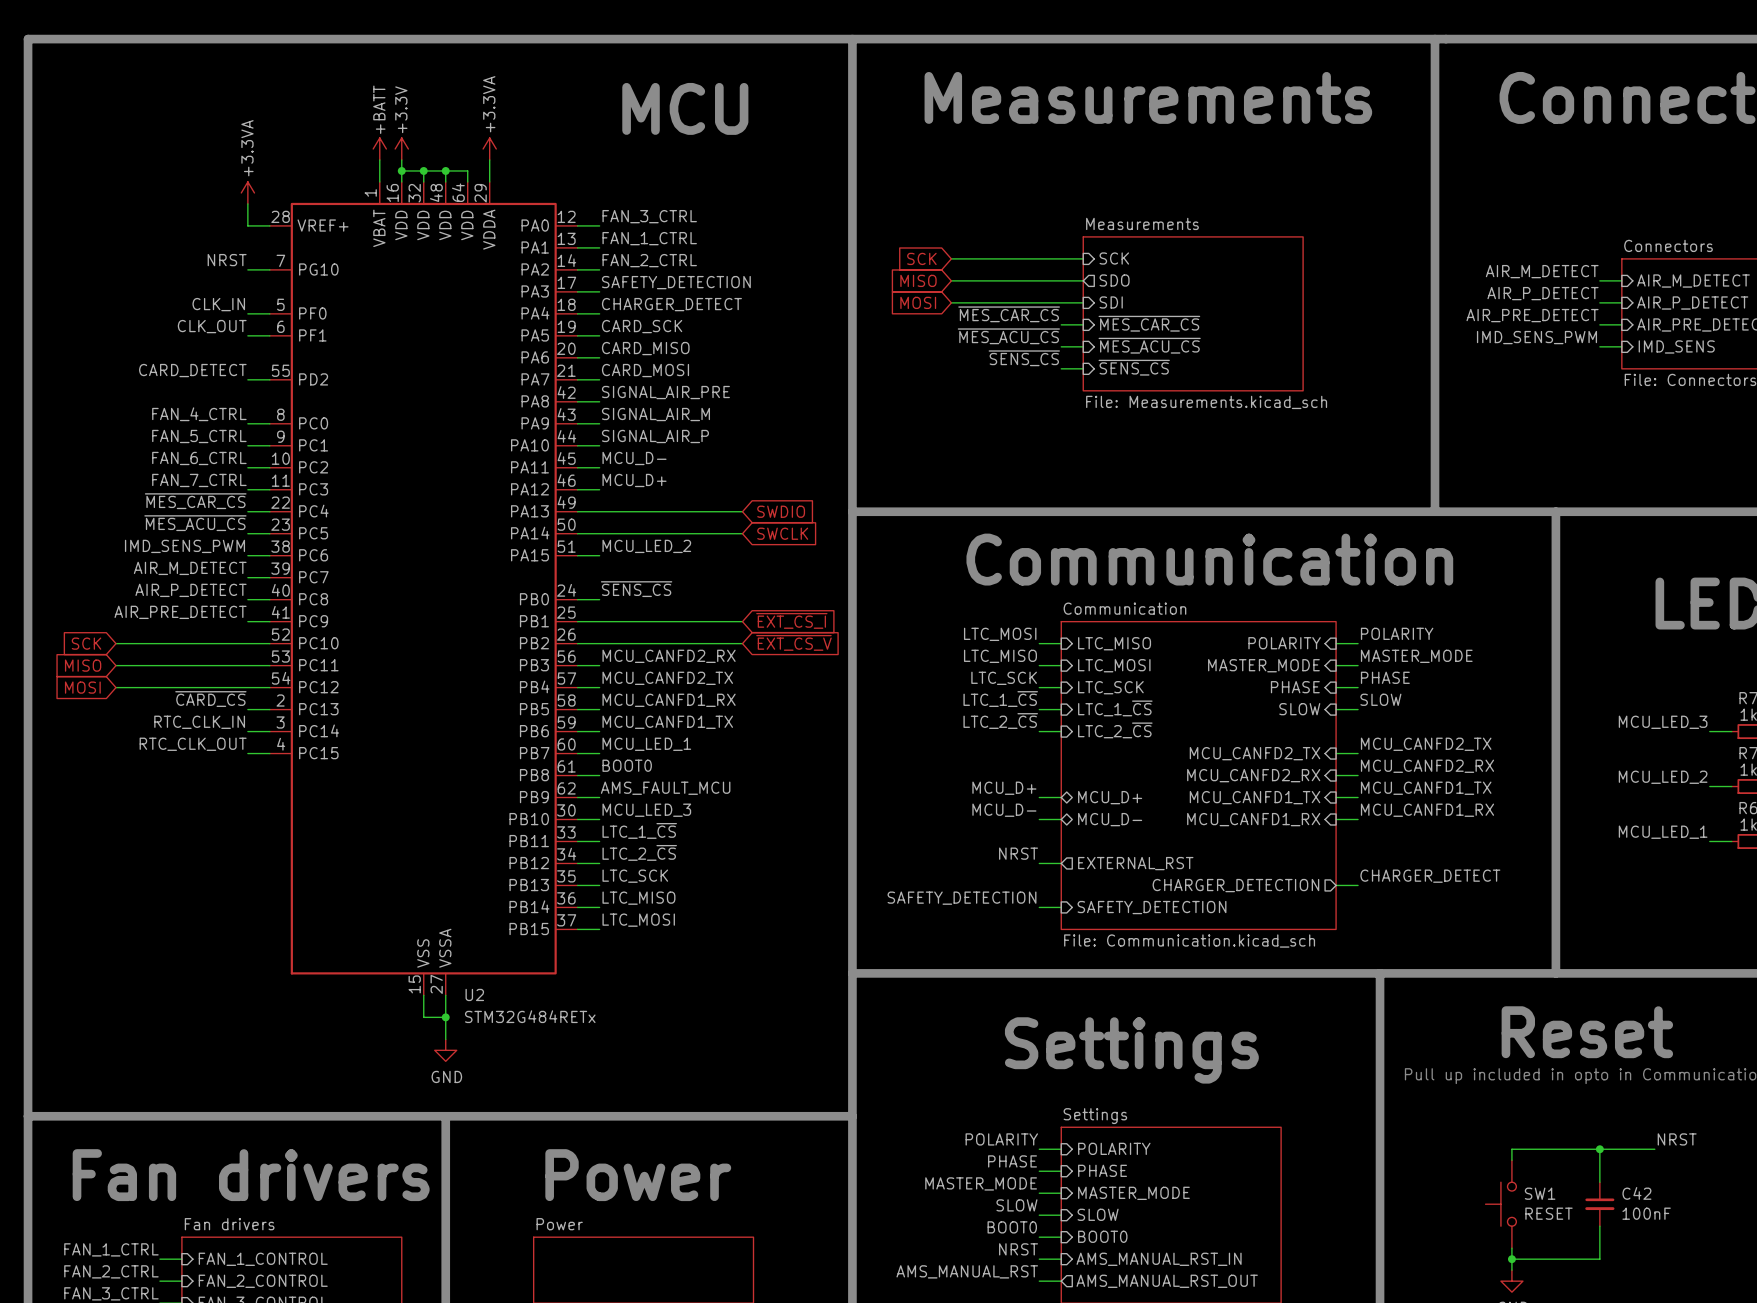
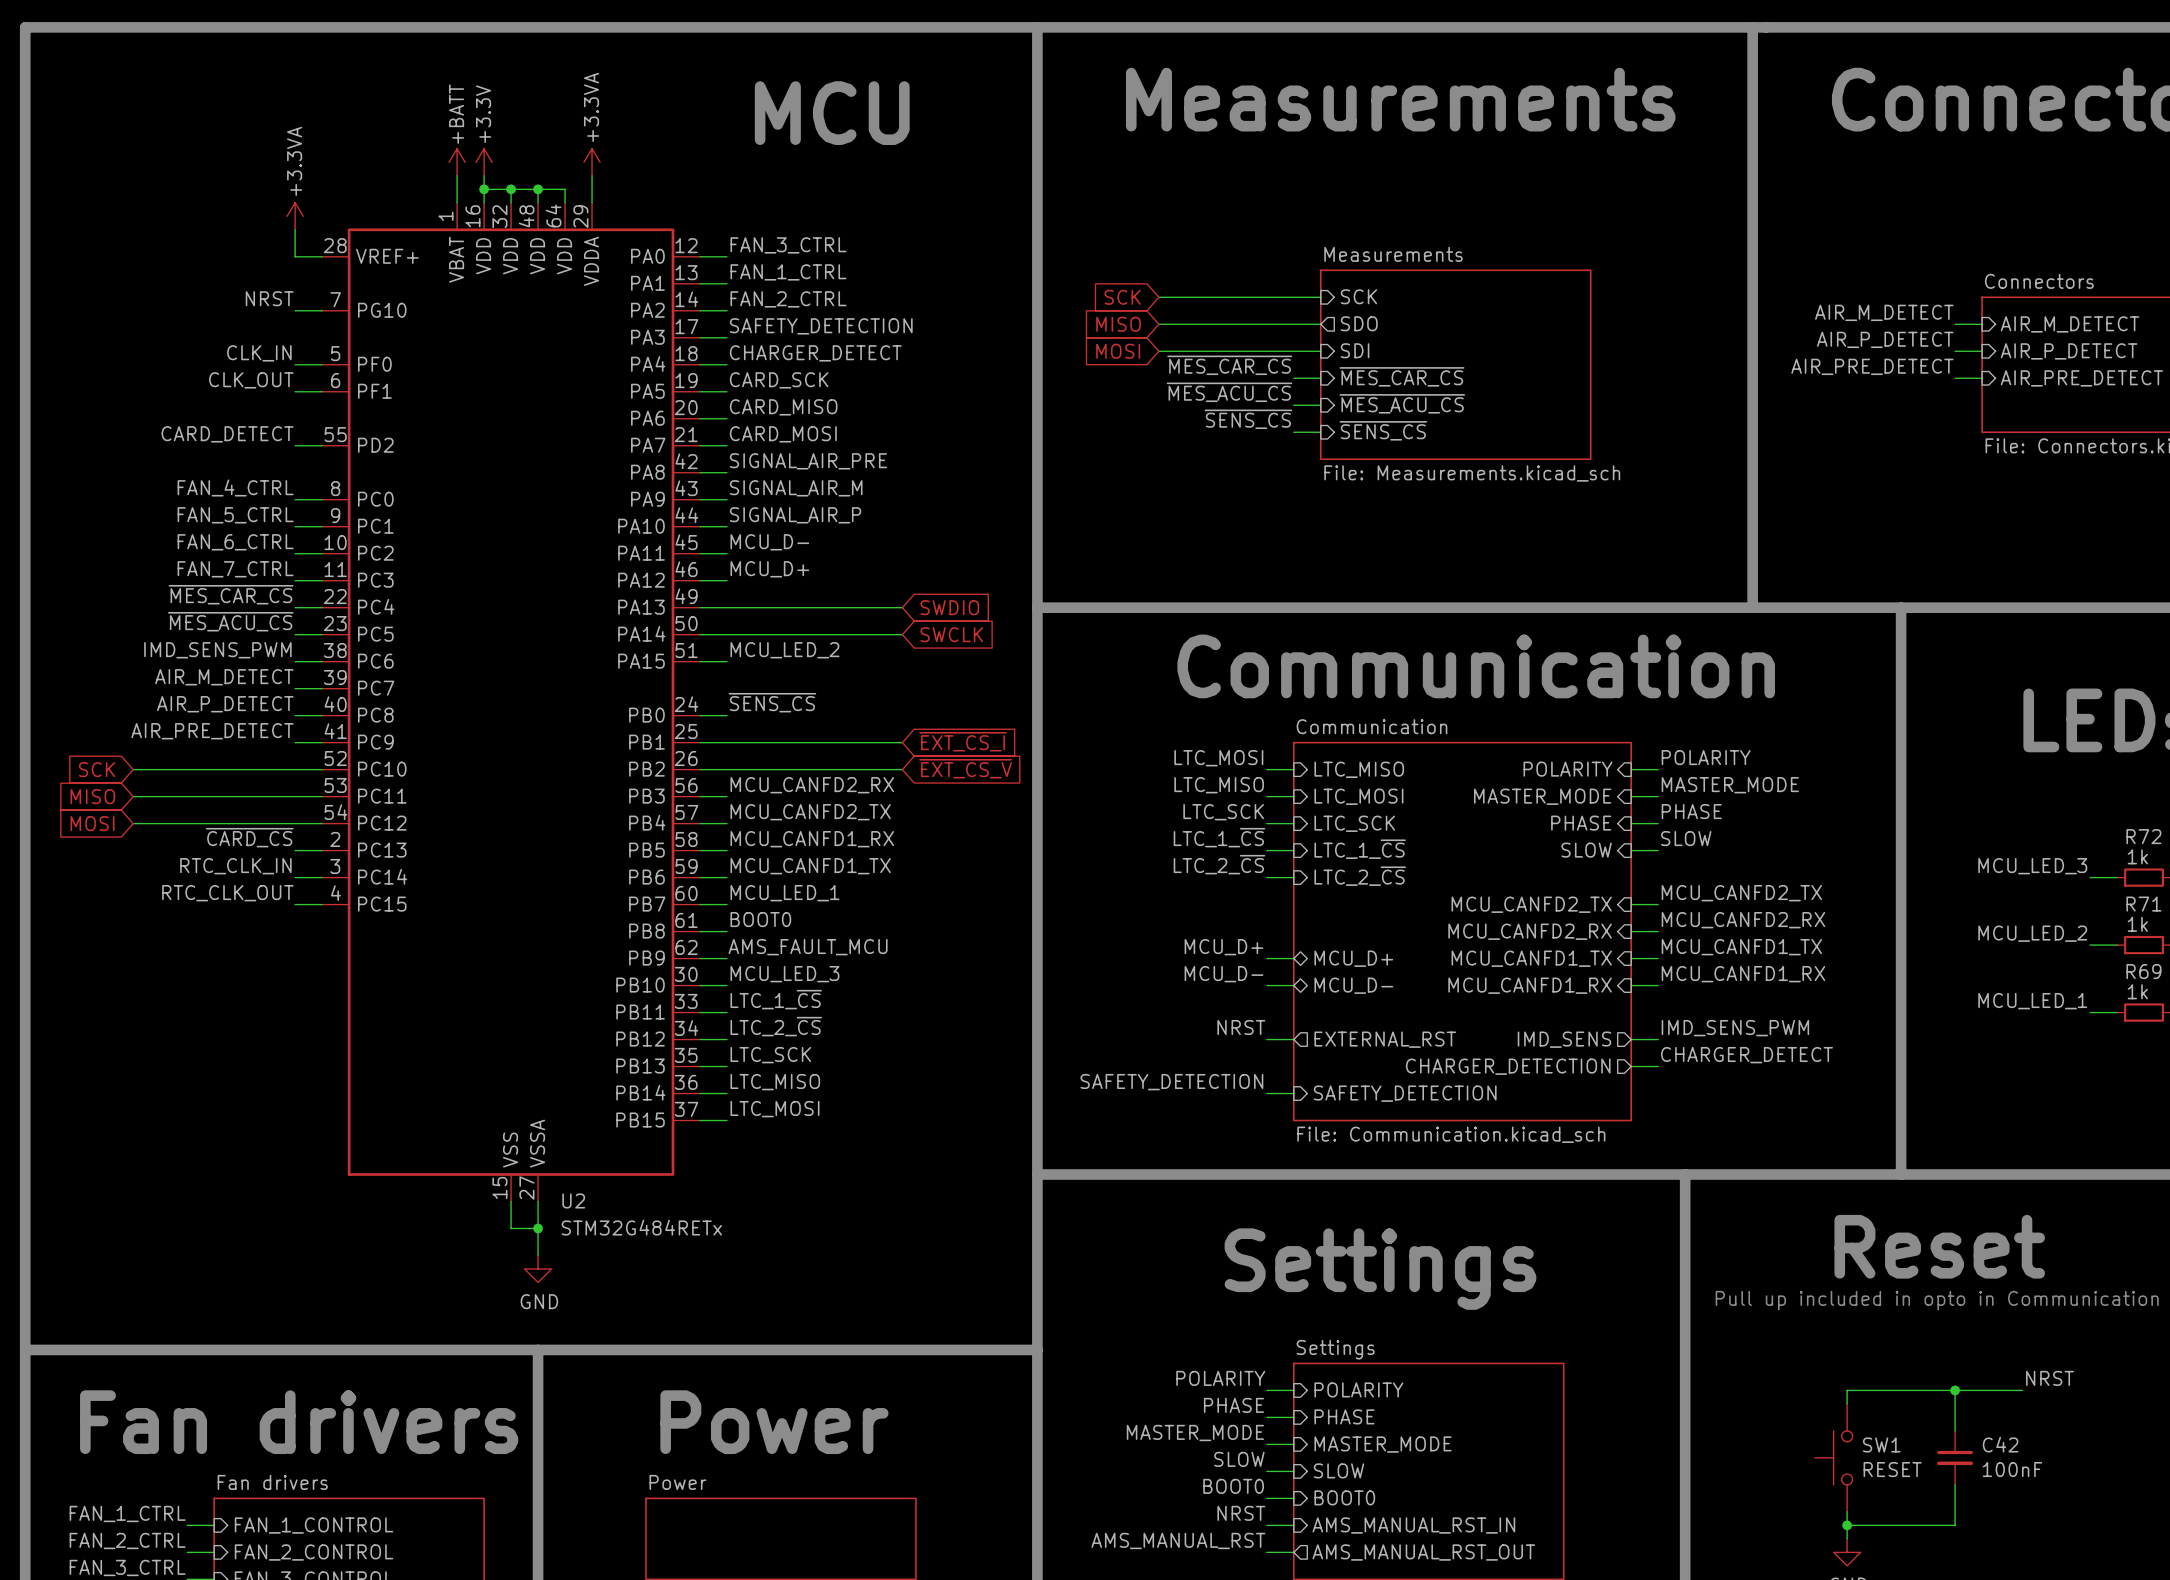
label: IMD_SENS_PWM (1536, 337) -> none
wire: (1599, 346) (1621, 346) -> none
sheet pin: IMD_SENS (1676, 346) -> none
label: none -> IMD_SENS_PWM (1735, 1028)
sheet pin: none -> IMD_SENS (1564, 1039)
wire: none -> (1631, 1039) (1658, 1039)

